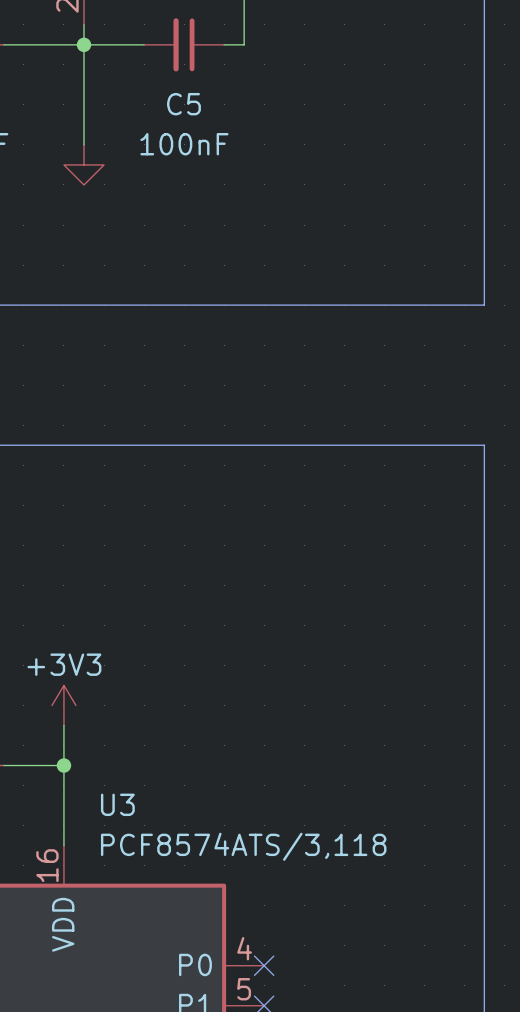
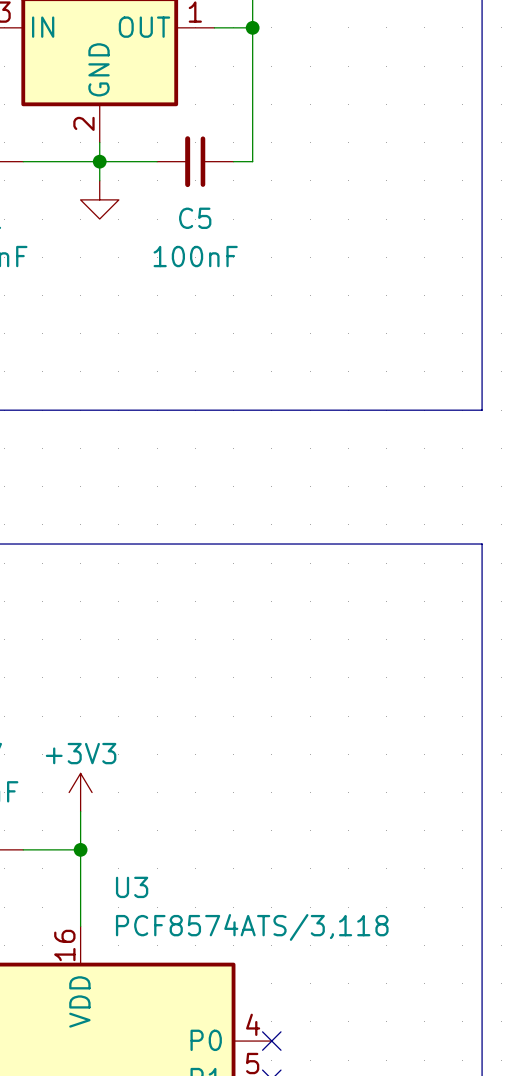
wire: (83, 64) (83, 144) -> none
power symbol position: (83, 164) -> (99, 199)

